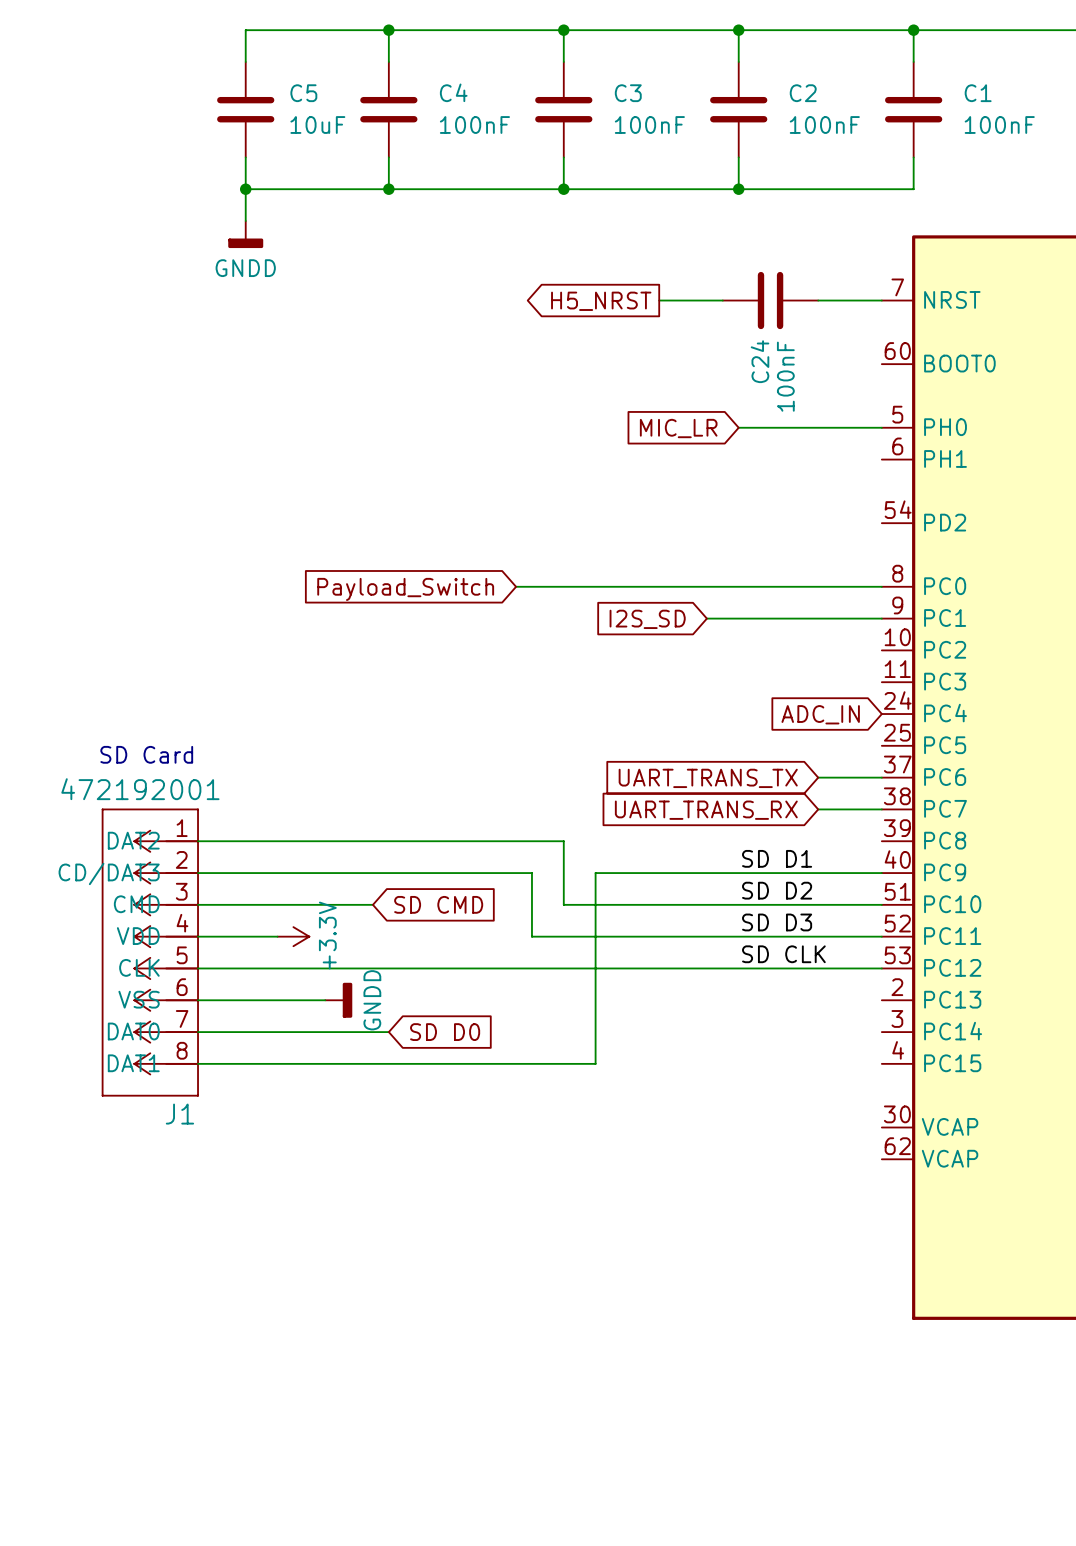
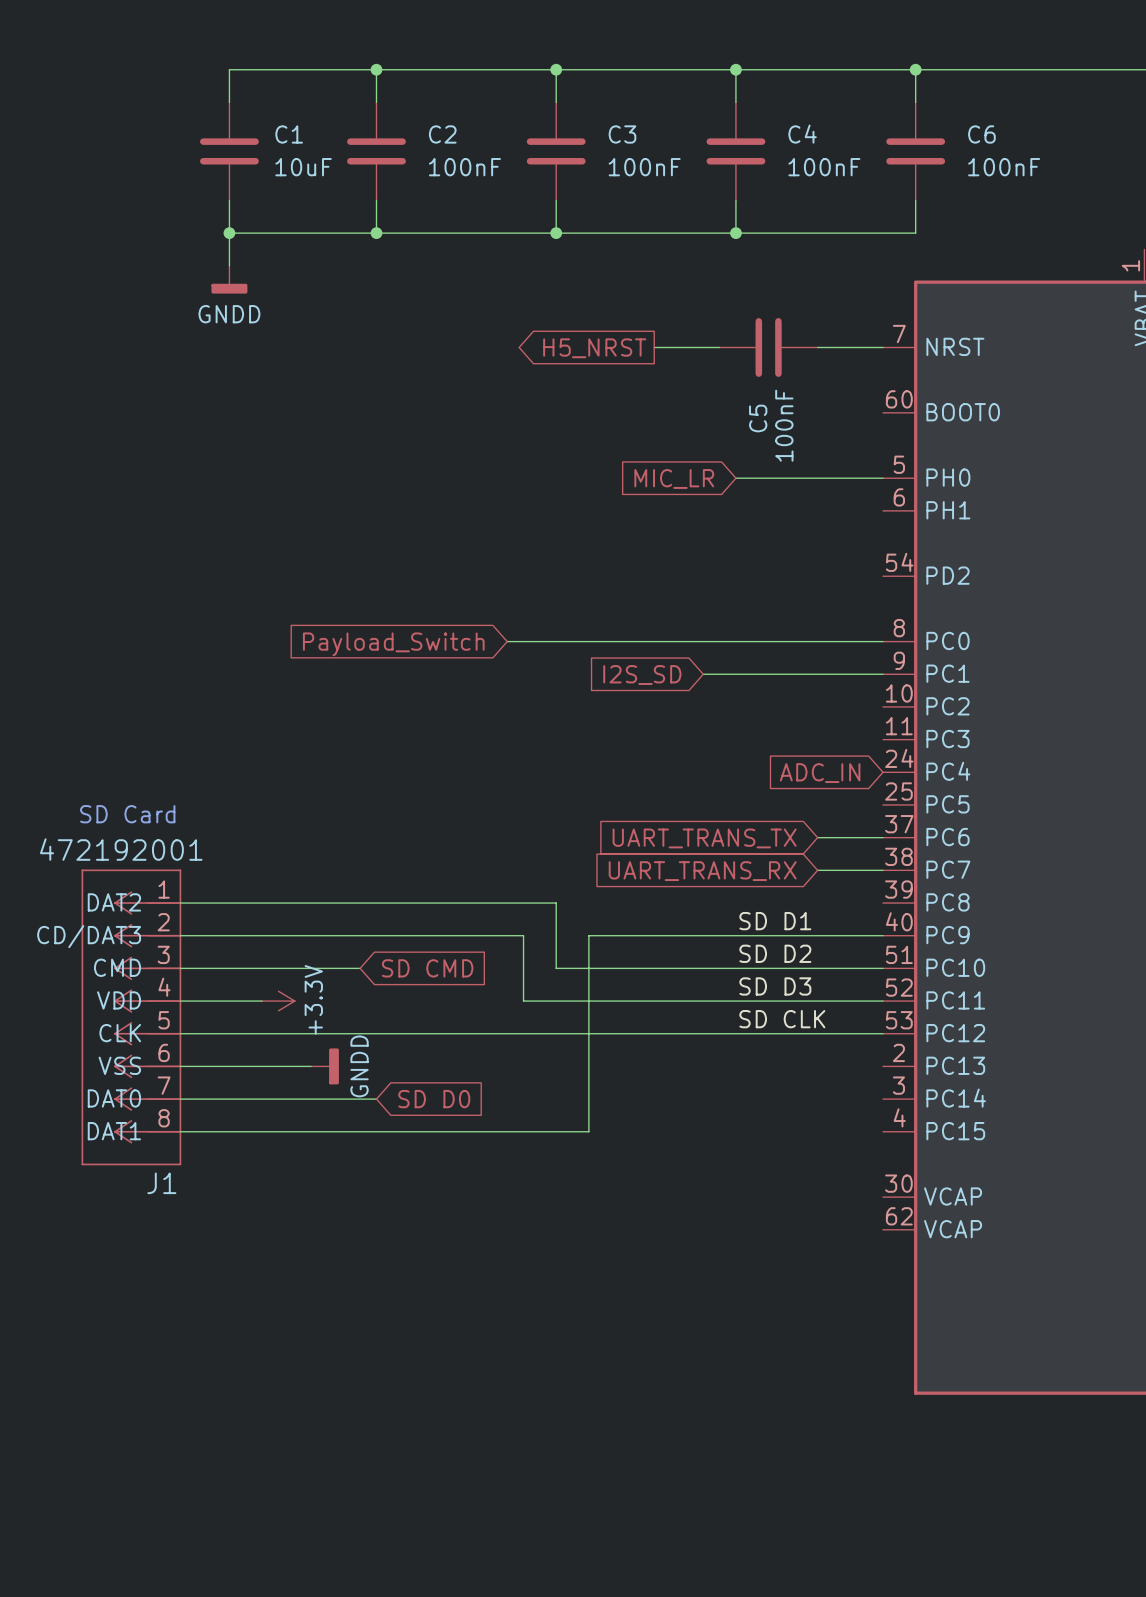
C4 name: C4 (453, 92) -> C2 (442, 134)
C5 name: C5 (303, 93) -> C1 (289, 134)
C2 name: C2 (803, 93) -> C4 (802, 134)
C1 name: C1 (978, 93) -> C6 (981, 134)
C24 name: C24 (760, 361) -> C5 (758, 418)

